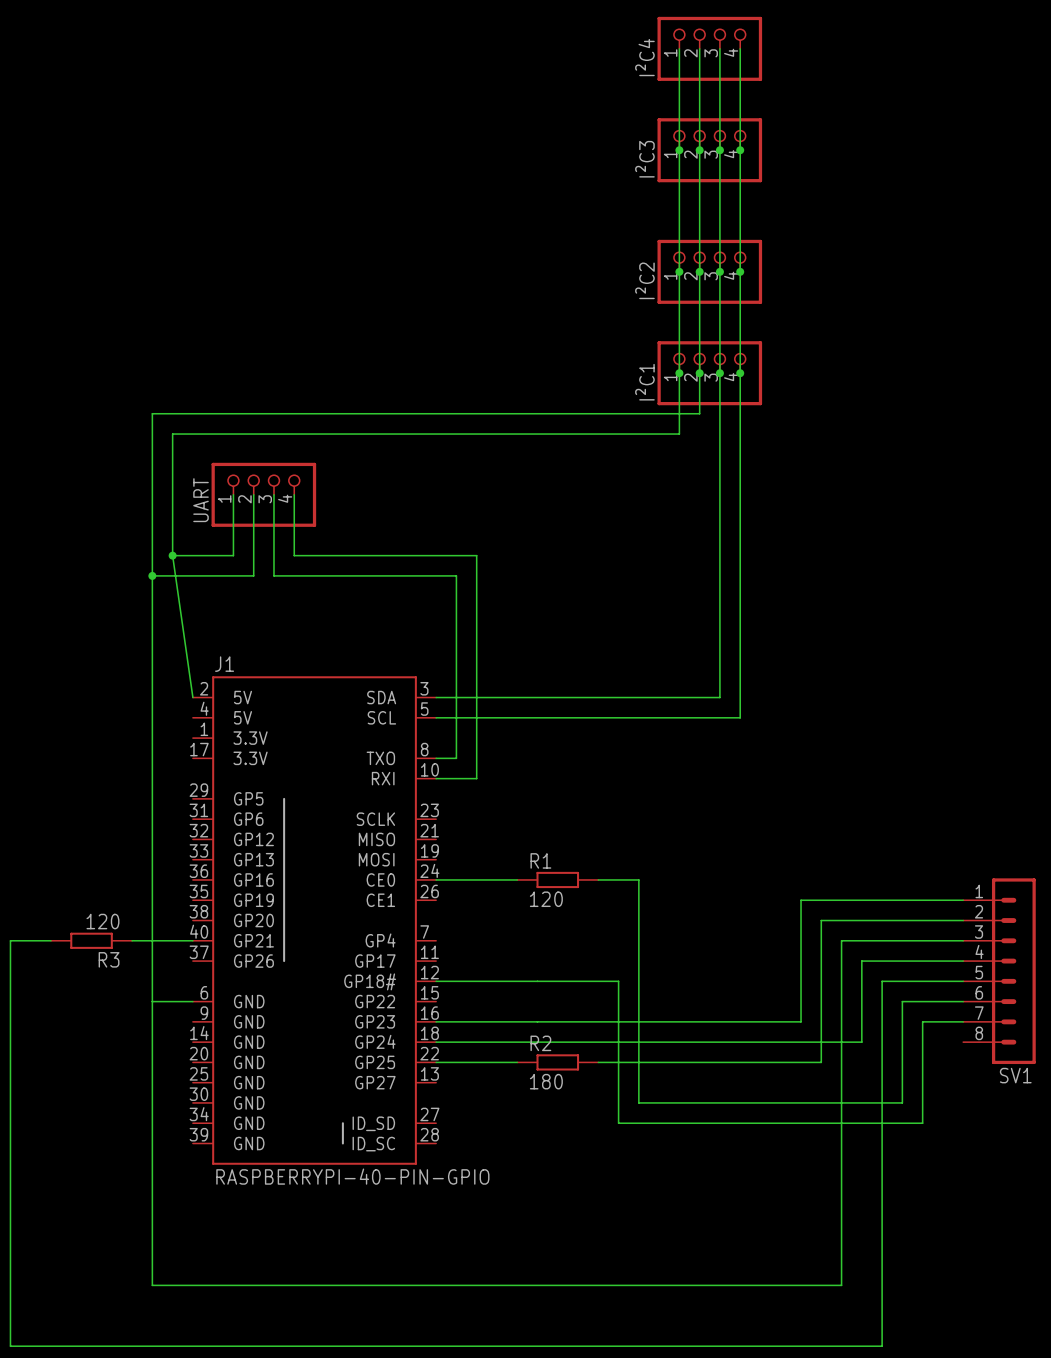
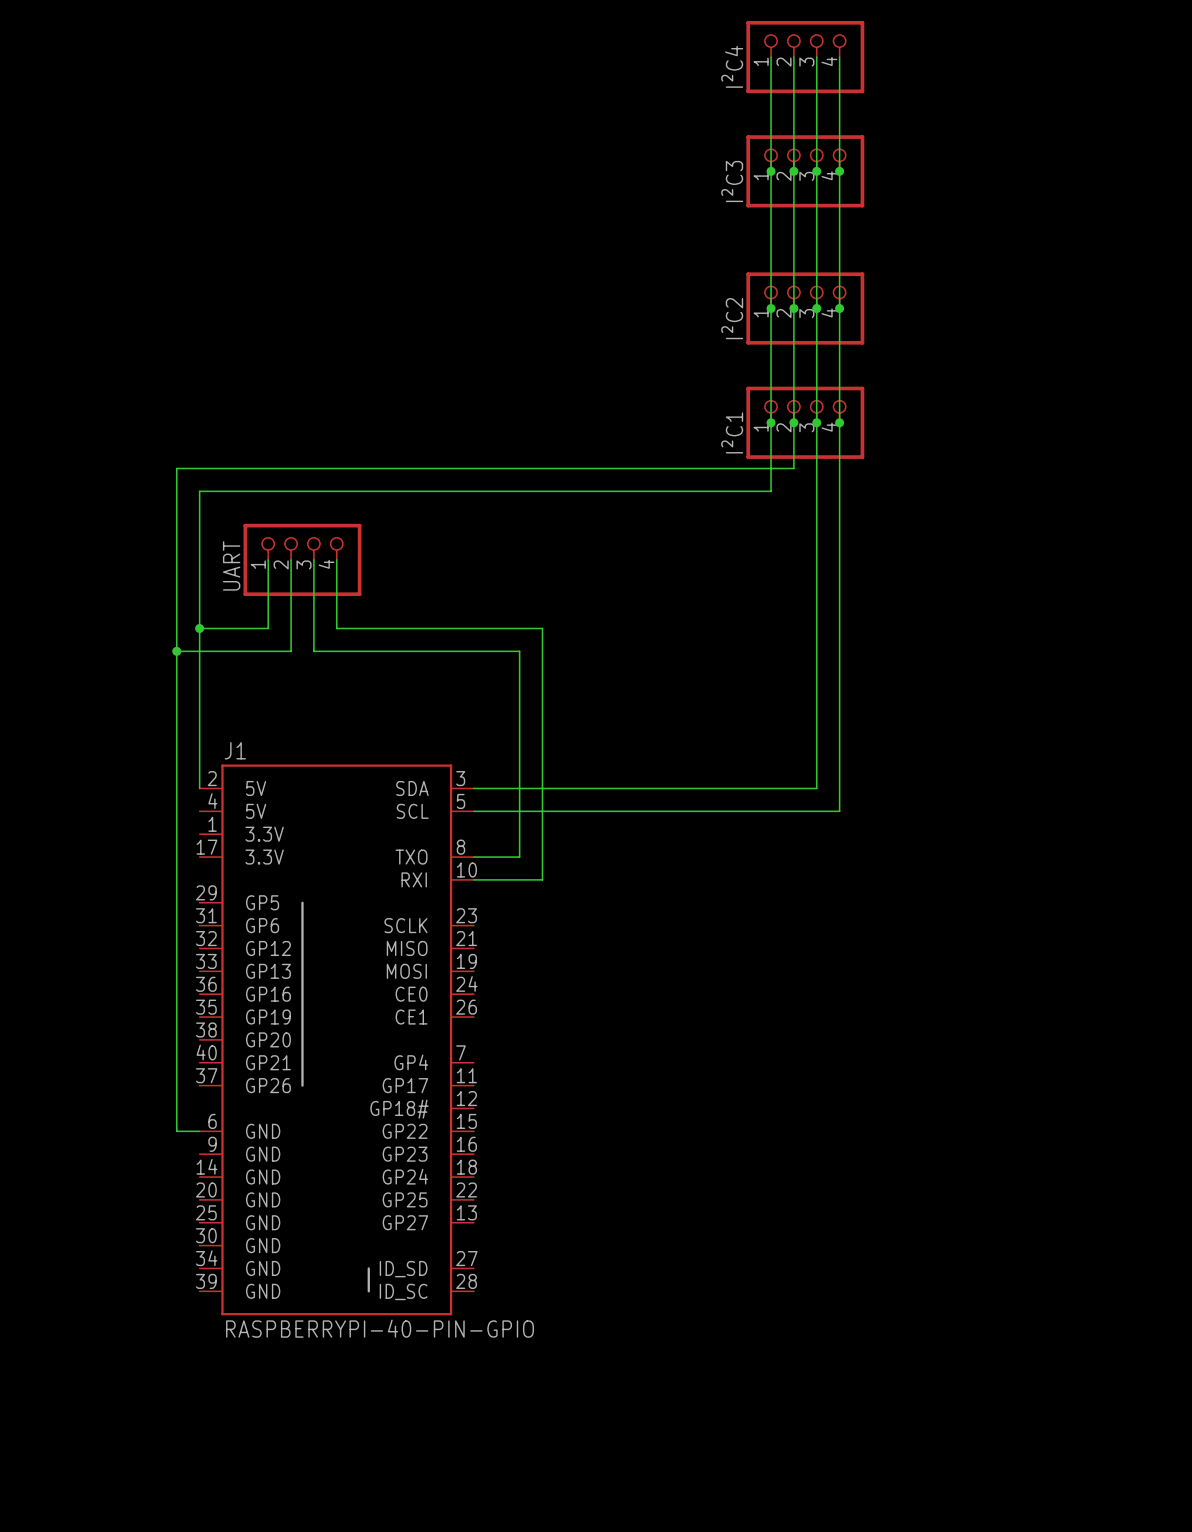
wire: (172, 555) (192, 697) -> (199, 628) (199, 788)
wire: (436, 879) (517, 879) -> none
R1: 120 (557, 879) -> none
wire: (598, 879) (638, 879) (638, 1102) (902, 1102) (902, 1001) (963, 1001) -> none
wire: (963, 900) (801, 900) (801, 1021) (436, 1021) -> none
J1 position: (314, 920) -> (336, 1039)
wire: (963, 920) (821, 920) (821, 1062) (598, 1062) -> none
wire: (51, 940) (10, 940) (10, 1346) (882, 1346) (882, 981) (963, 981) -> none
R3: 120 (91, 940) -> none
wire: (132, 940) (192, 940) -> none
wire: (963, 940) (841, 940) (841, 1285) (152, 1285) (152, 1001) -> none
wire: (963, 961) (861, 961) (861, 1042) (436, 1042) -> none
SV1: (999, 971) -> none
wire: (436, 981) (618, 981) (618, 1123) (922, 1123) (922, 1021) (963, 1021) -> none
wire: (436, 1062) (517, 1062) -> none
R2: 180 (557, 1062) -> none

